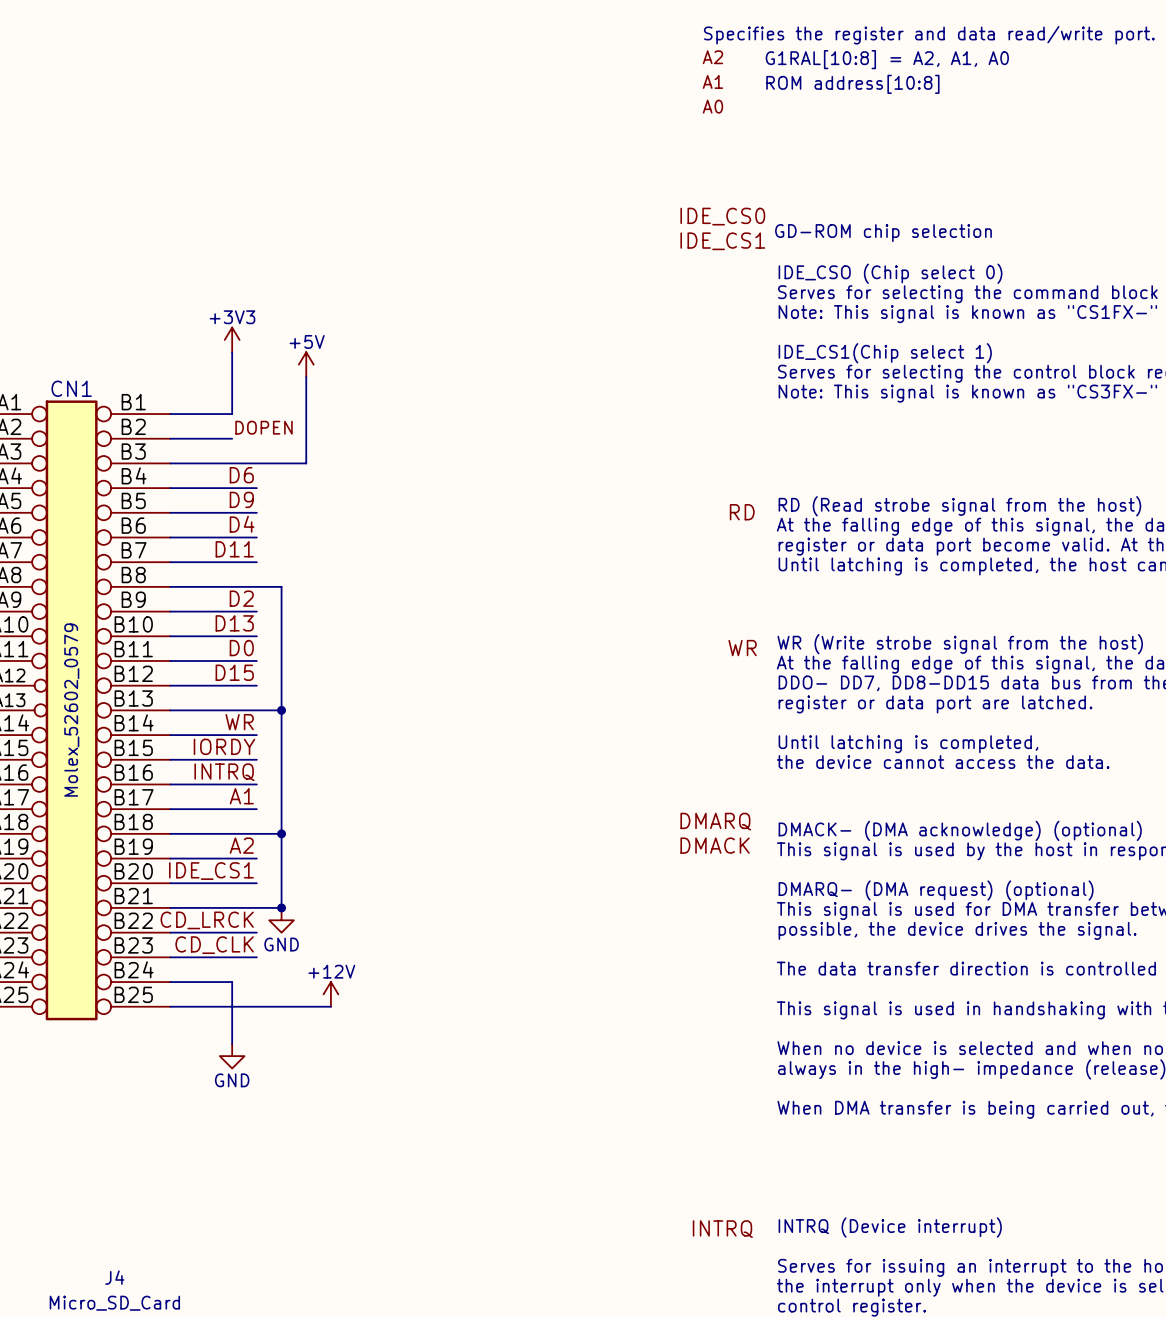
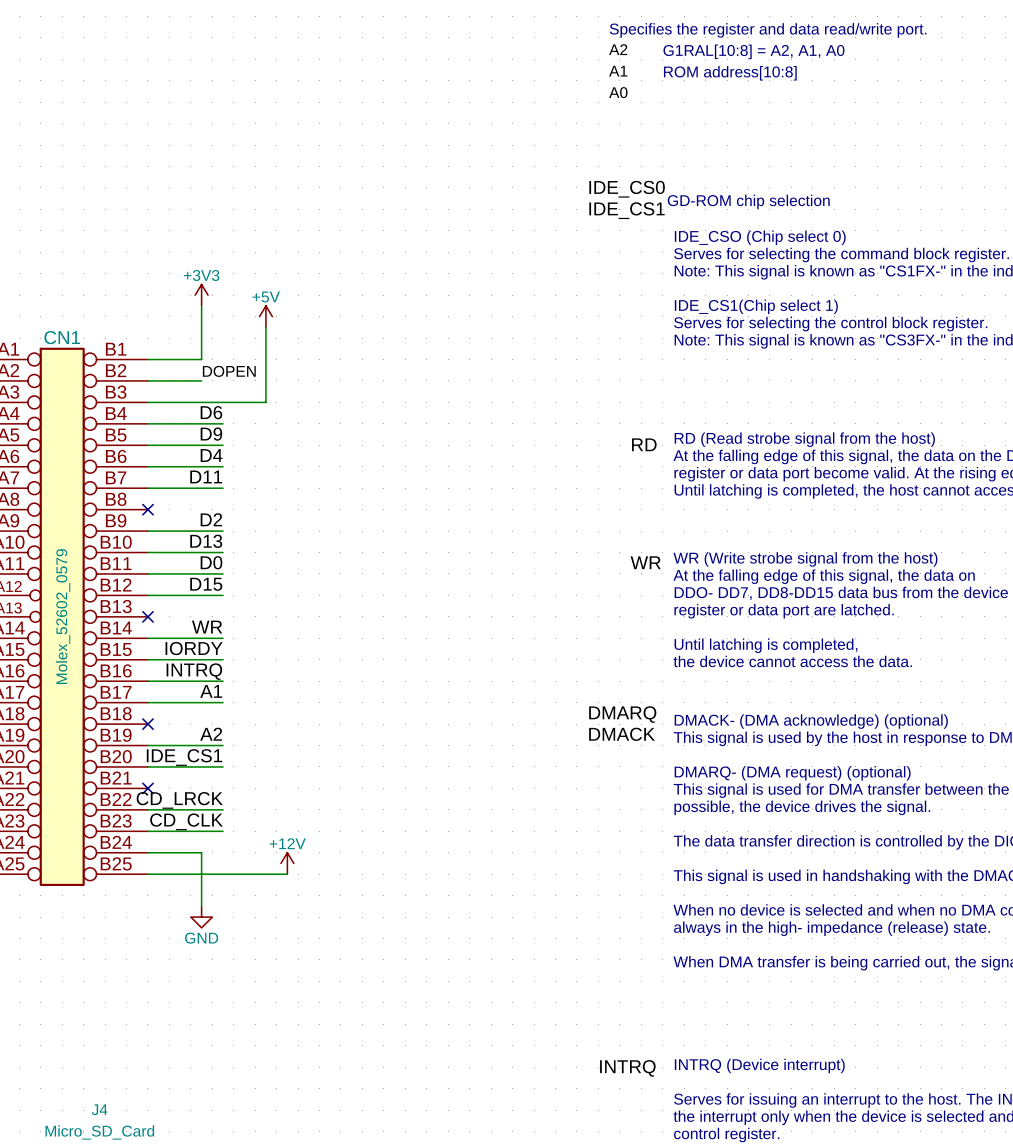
wire: (170, 586) (281, 586) (281, 907) (170, 907) -> none
no-connect mark: none -> (147, 509)
wire: (170, 710) (281, 710) -> none
no-connect mark: none -> (147, 616)
junction: (281, 710) -> none
wire: (170, 833) (281, 833) -> none
no-connect mark: none -> (147, 724)
junction: (281, 833) -> none
no-connect mark: none -> (147, 788)
junction: (281, 907) -> none
power symbol: GND (281, 920) -> none

